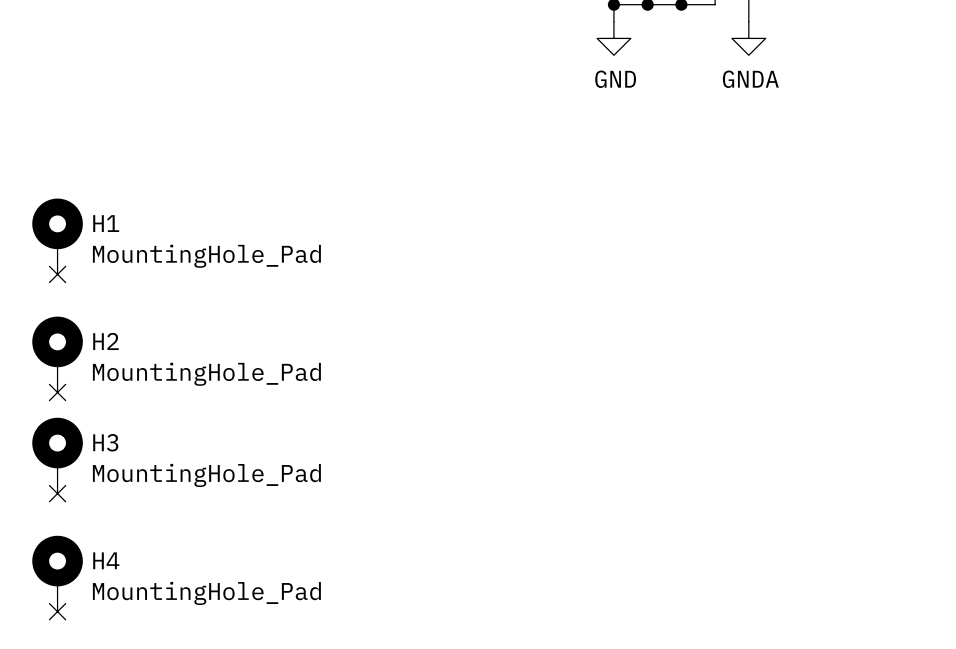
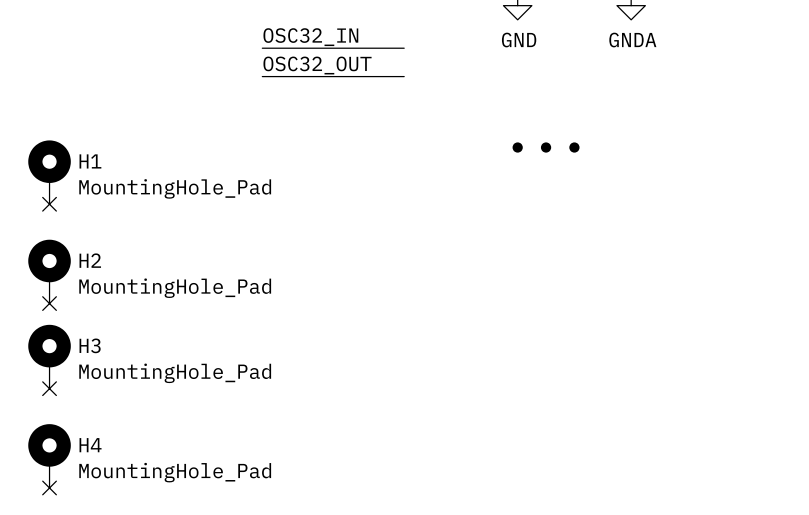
label: none -> OSC32_IN (310, 37)
wire: none -> (262, 48) (404, 48)
label: none -> OSC32_OUT (317, 65)
wire: none -> (262, 76) (404, 76)
junction: none -> (517, 147)
junction: none -> (546, 147)
junction: none -> (574, 147)

